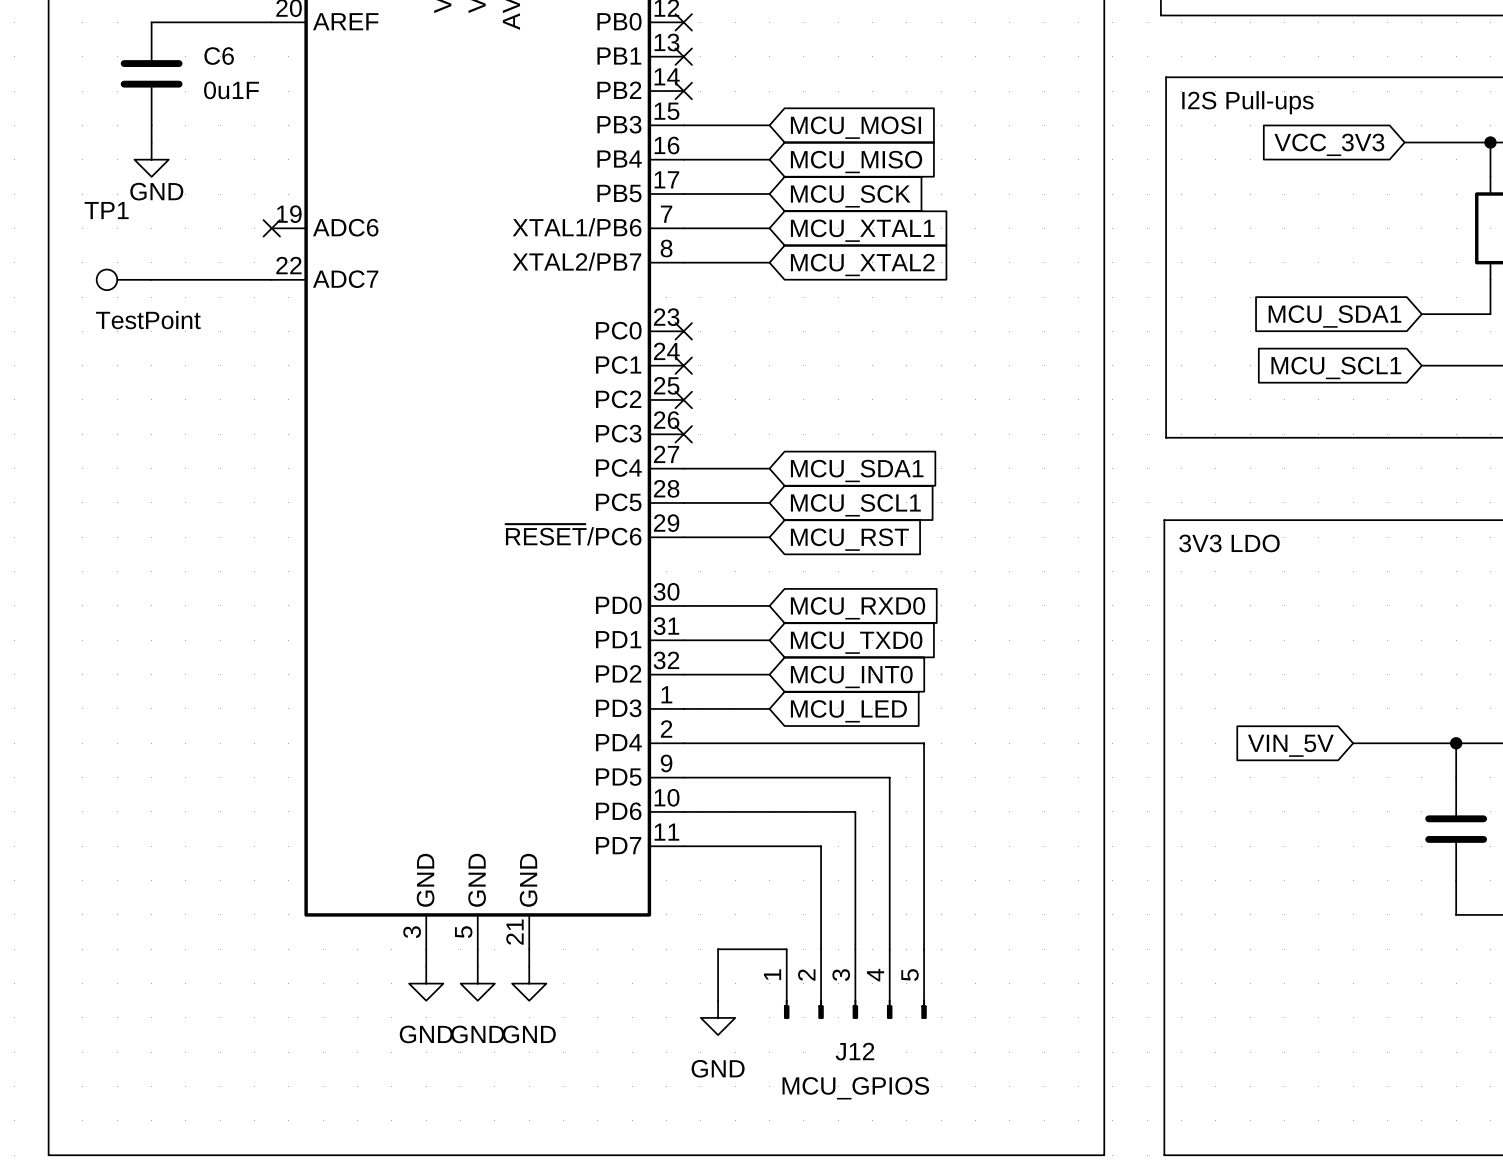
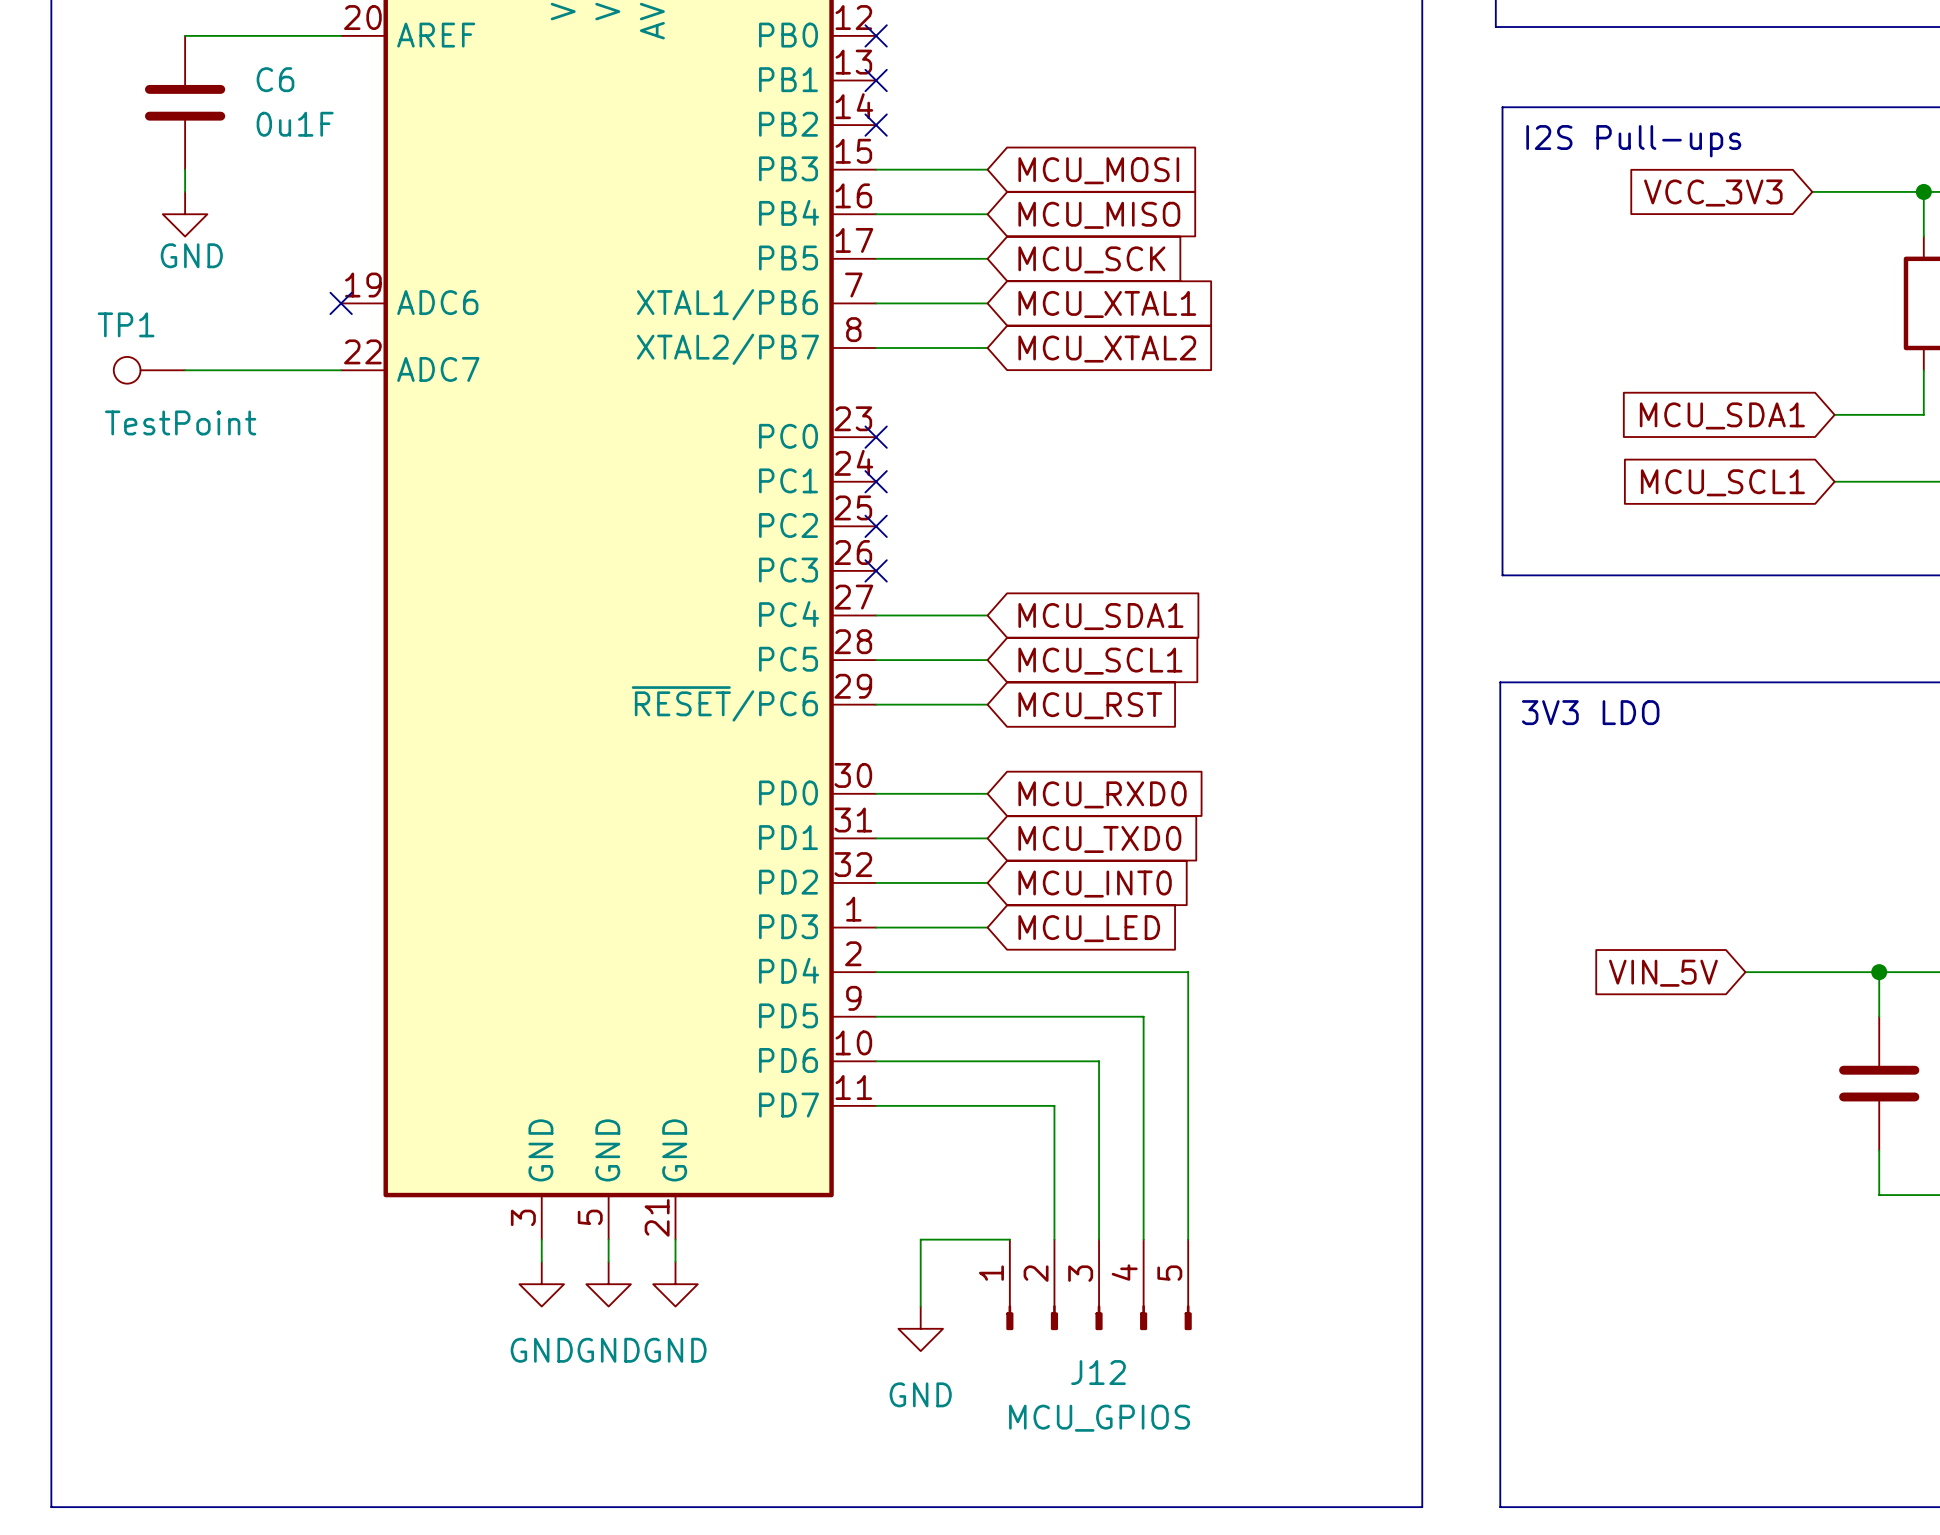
TP1 name position: TP1 (106, 210) -> TP1 (126, 324)

